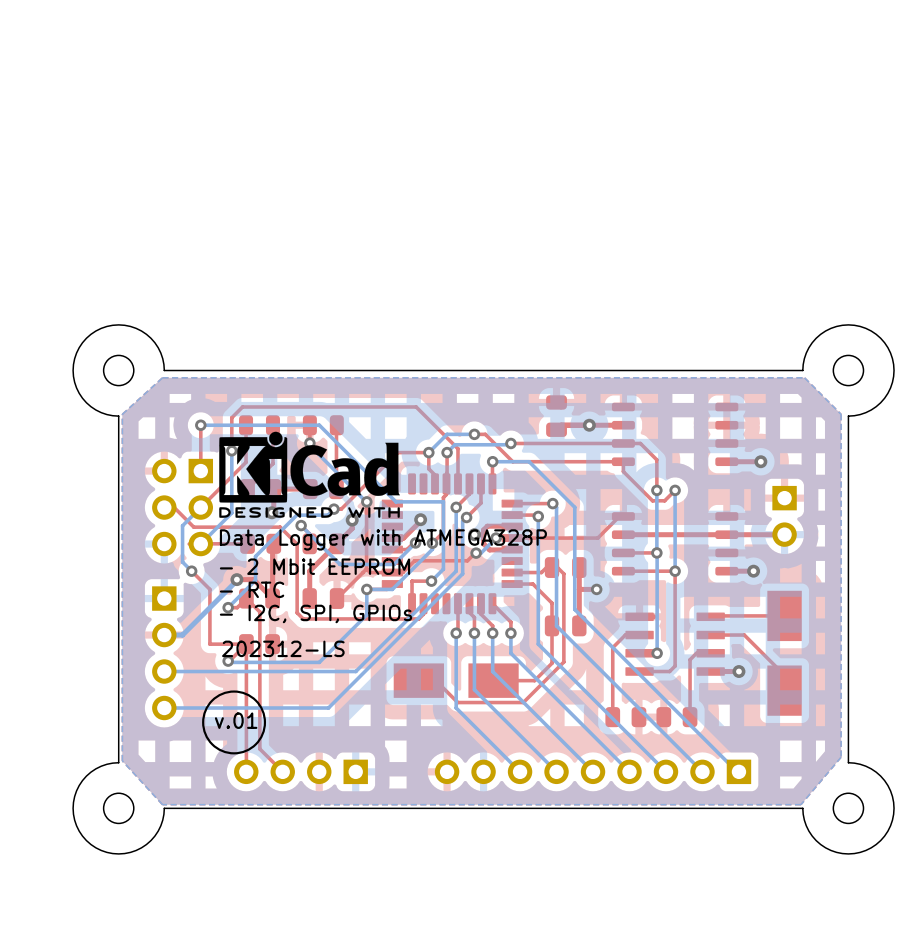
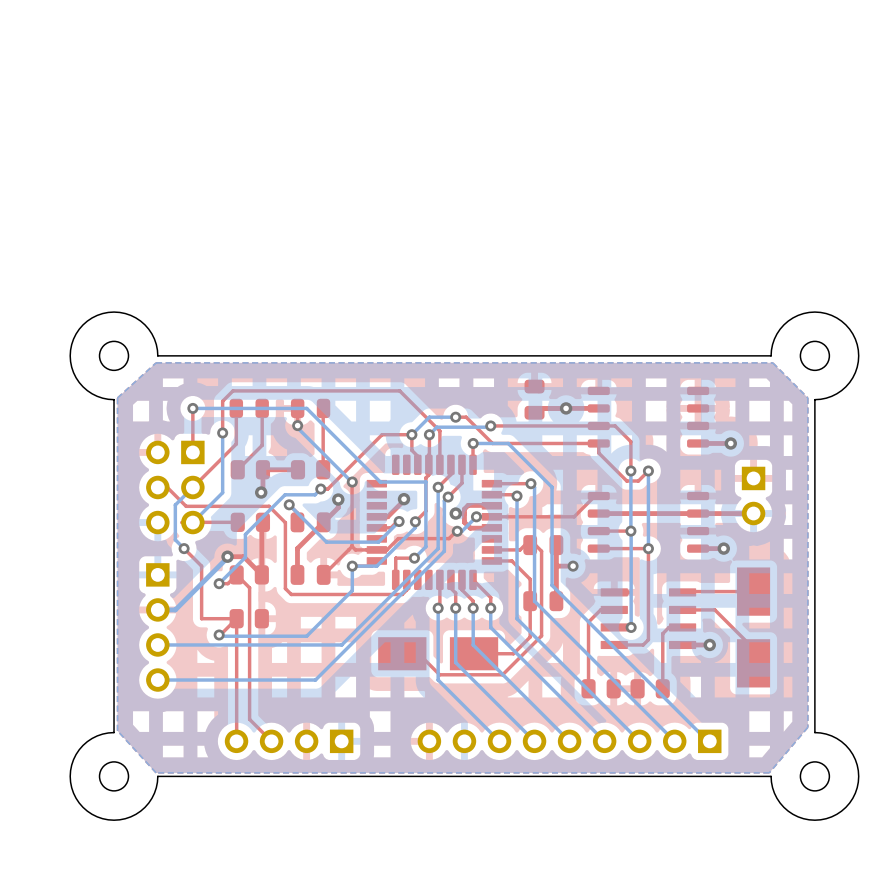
drawing: [219, 431, 400, 518] -> none
text: Data Logger with ATMEGA328P (383, 539) -> none
text: - 2 Mbit EEPROM (314, 566) -> none
text: - RTC (252, 589) -> none
text: - I2C, SPI, GPIOs (316, 613) -> none
text: 202312-LS (283, 648) -> none
drawing: [202, 690, 267, 755] -> none
text: v.01 (236, 720) -> none

